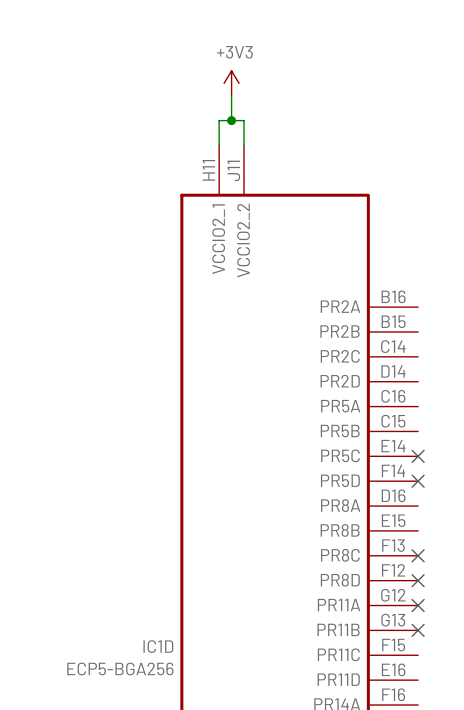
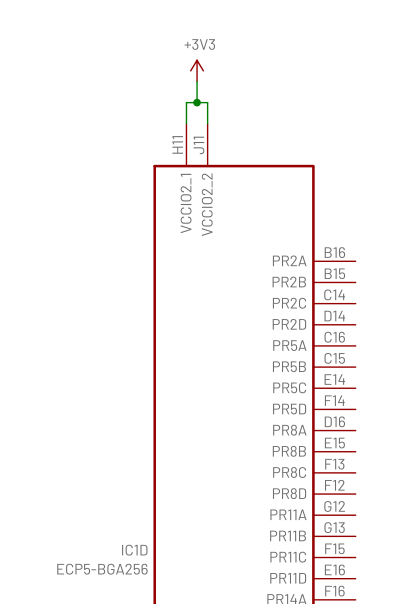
no-connect mark: (418, 456) -> none
no-connect mark: (418, 481) -> none
no-connect mark: (418, 555) -> none
no-connect mark: (418, 580) -> none
no-connect mark: (418, 605) -> none
no-connect mark: (418, 630) -> none

